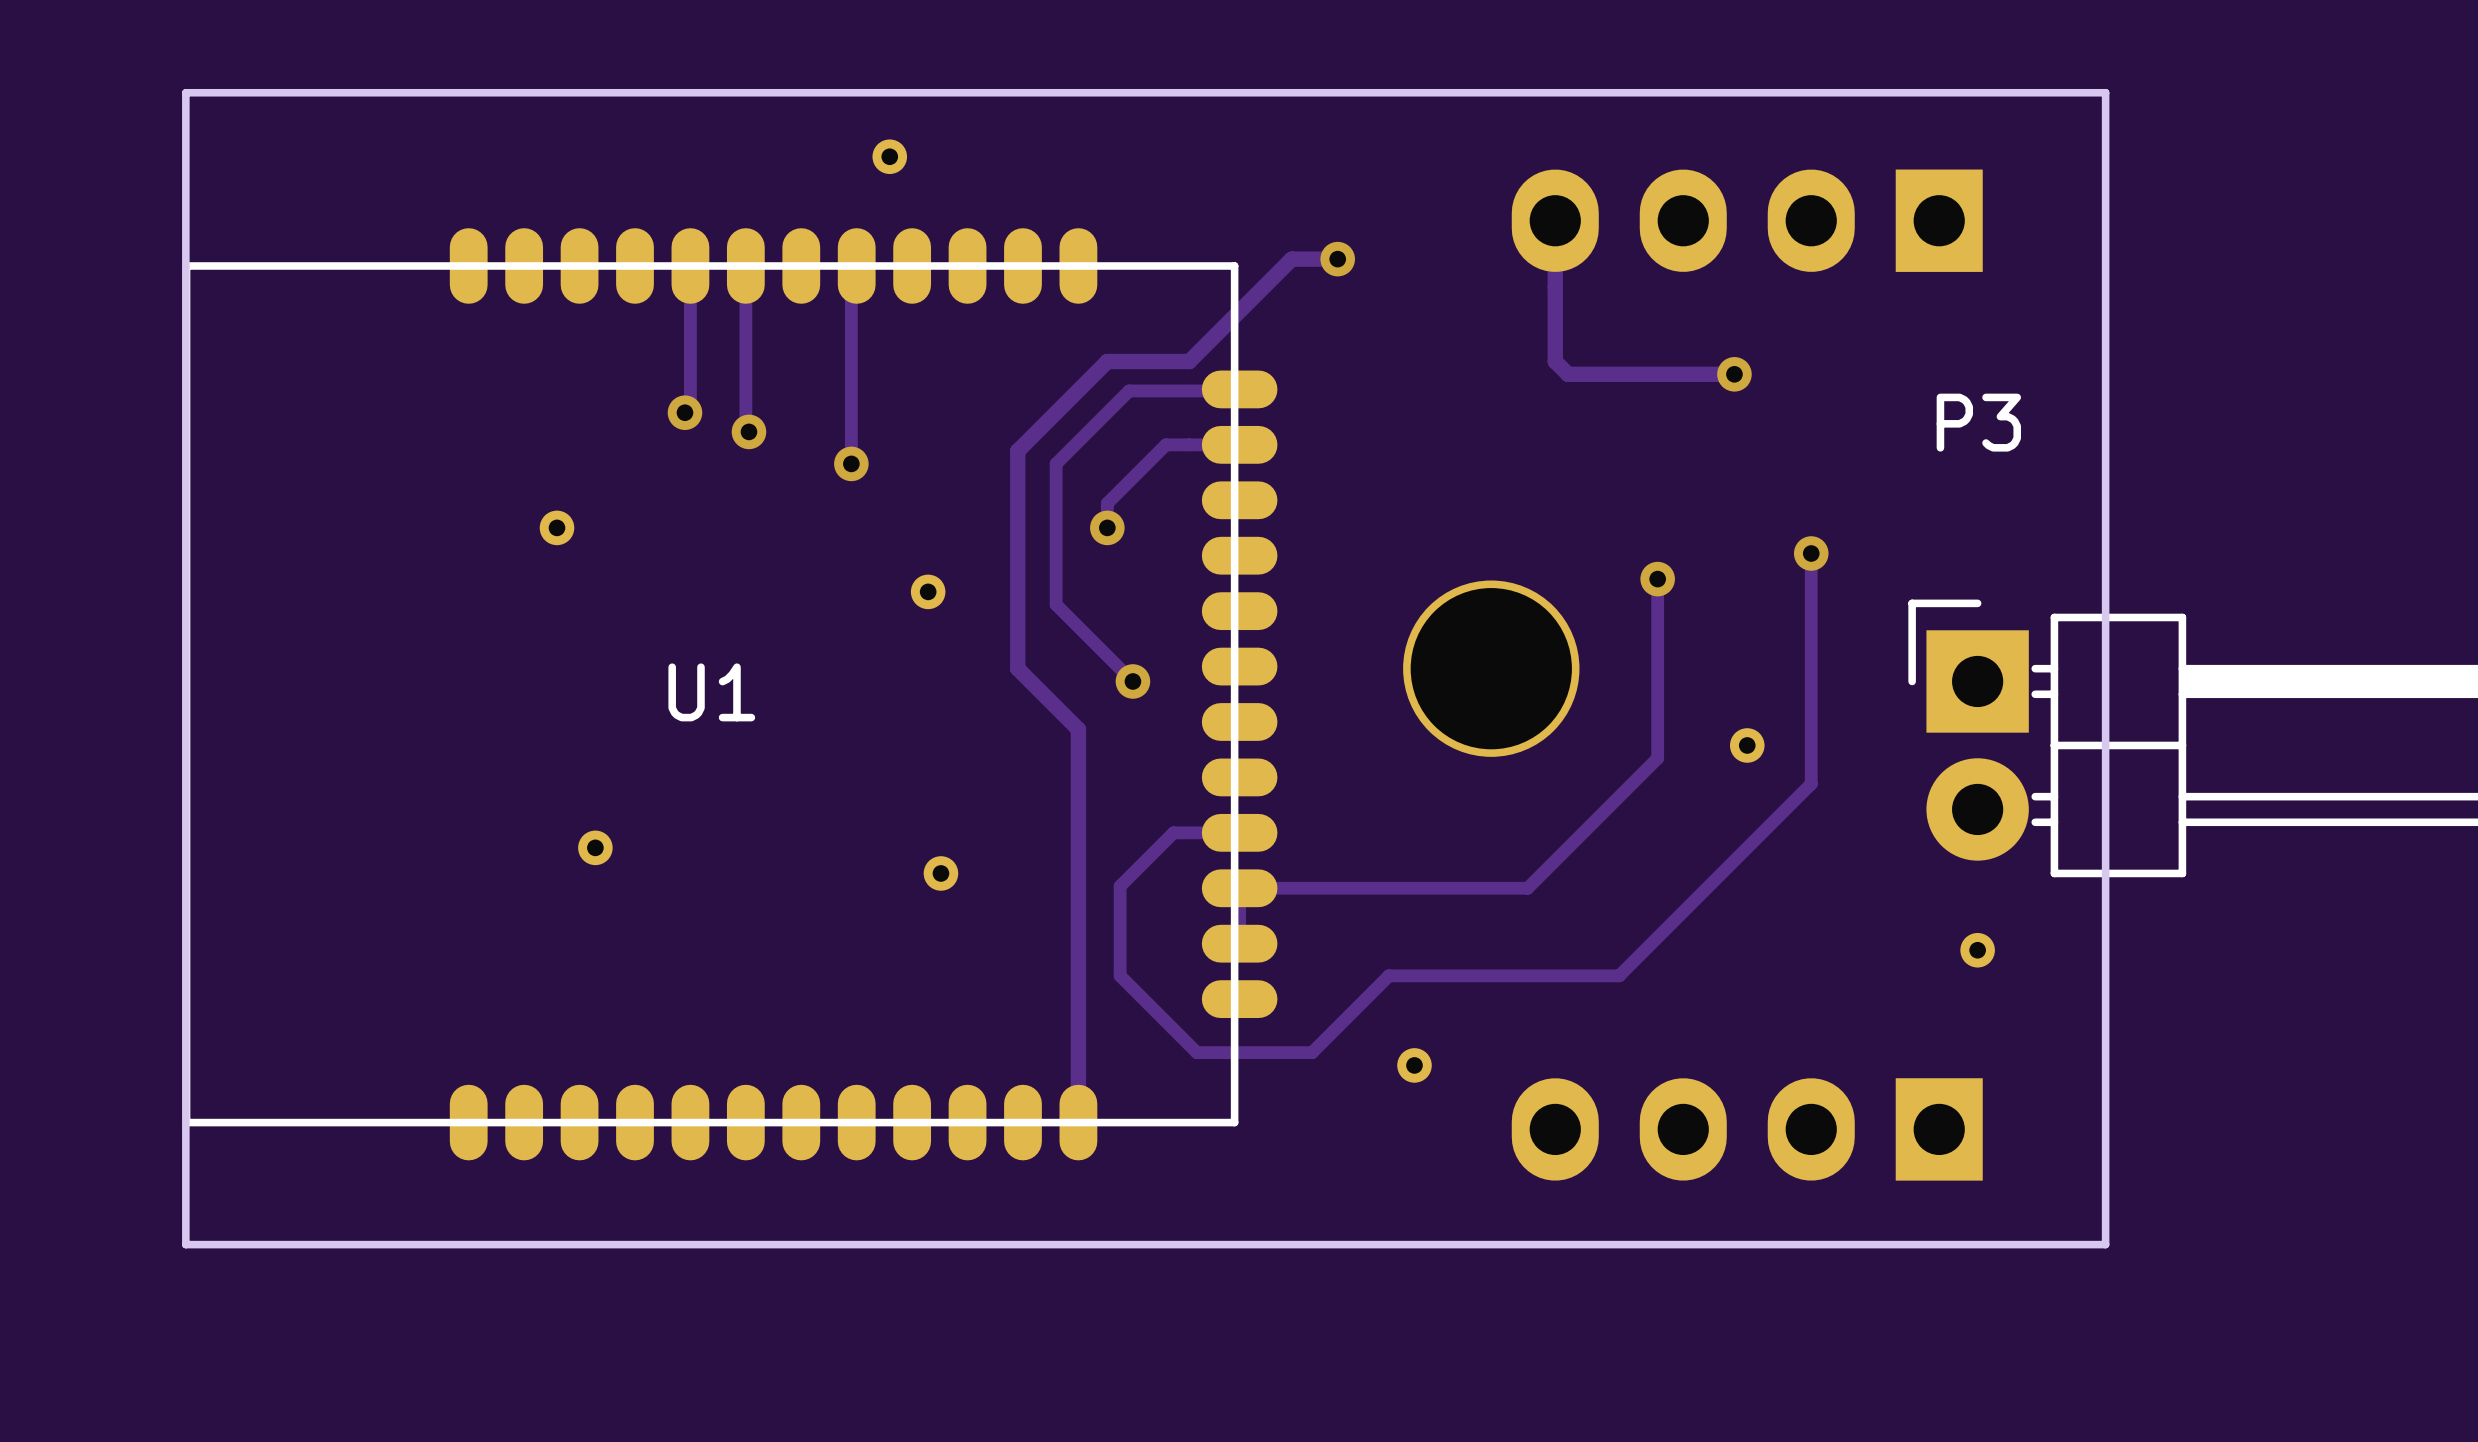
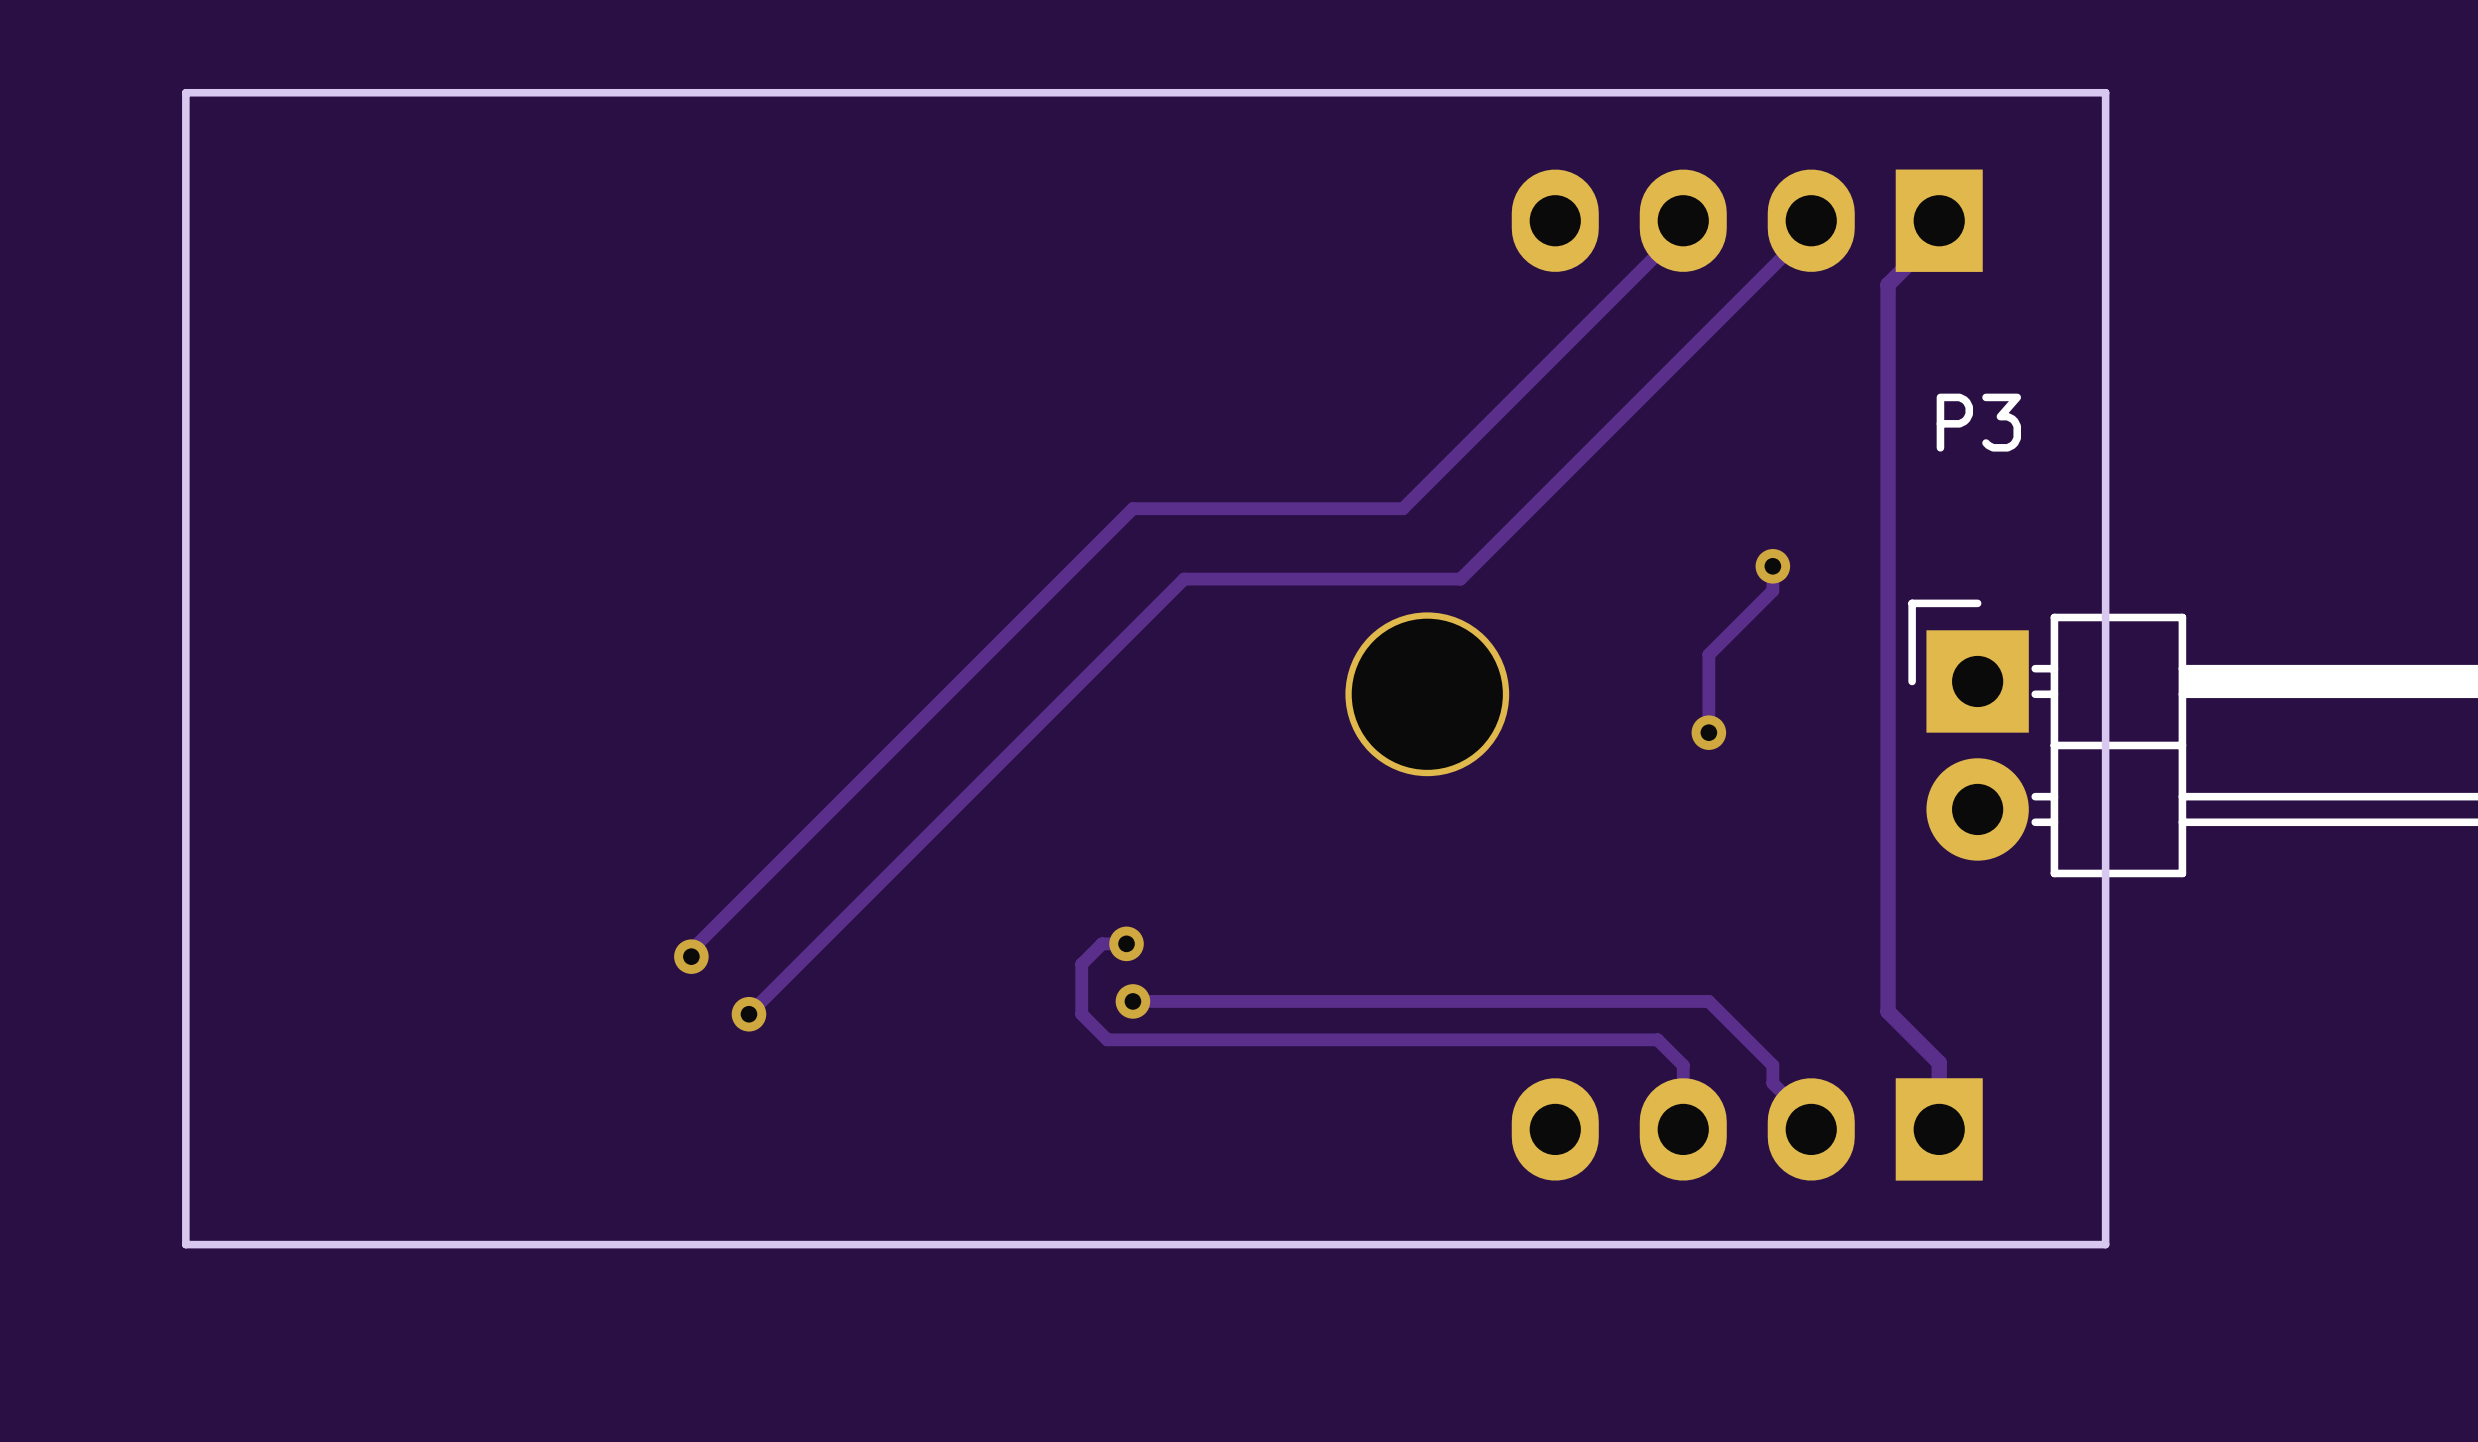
part: (889, 156) -> none
track: (1555, 220) (1555, 361) (1568, 374) (1734, 374) -> none
track: none -> (1683, 220) (1683, 228) (1402, 508) (1132, 508) (691, 950) (691, 956)
track: none -> (1939, 220) (1939, 233) (1888, 284) (1888, 1011) (1939, 1062) (1939, 1129)
track: none -> (1811, 228) (1460, 579) (1184, 579) (748, 1014)
track: (1337, 259) (1291, 259) (1189, 361) (1107, 361) (1017, 451) (1017, 668) (1078, 729) (1078, 1122) -> none
via: (1337, 259) -> none
track: (690, 265) (690, 407) (684, 412) -> none
track: (745, 265) (745, 428) (748, 431) -> none
track: (856, 265) (851, 271) (851, 463) -> none
via: (1734, 374) -> none
track: (1239, 389) (1238, 390) (1129, 390) (1056, 463) (1056, 604) (1132, 681) -> none
via: (684, 412) -> none
via: (748, 431) -> none
track: (1239, 444) (1165, 444) (1107, 503) (1107, 527) -> none
via: (851, 463) -> none
part: (557, 527) -> none
via: (1107, 527) -> none
track: (1811, 553) (1811, 783) (1619, 975) (1388, 975) (1312, 1052) (1196, 1052) (1120, 975) (1120, 886) (1173, 832) (1239, 832) -> none
via position: (1811, 553) -> (1772, 566)
track: none -> (1772, 566) (1772, 590) (1708, 654) (1708, 732)
track: (1657, 579) (1657, 758) (1527, 888) (1239, 888) (1239, 943) -> none
via: (1657, 579) -> none
part: (928, 591) -> none
part: (1491, 668) -> none
via: (1132, 681) -> none
U1: (730, 694) -> none
part: none -> (1427, 694)
via: none -> (1708, 732)
part: (1747, 745) -> none
part: (595, 847) -> none
part: (940, 873) -> none
track: none -> (1126, 943) (1102, 943) (1081, 964) (1081, 1014) (1107, 1039) (1657, 1039) (1683, 1065) (1683, 1129)
via: none -> (1126, 943)
part: (1977, 950) -> none
via: none -> (691, 956)
track: none -> (1132, 1001) (1708, 1001) (1772, 1065) (1772, 1083) (1811, 1121)
via: none -> (1132, 1001)
via: none -> (748, 1014)
part: (1414, 1065) -> none

